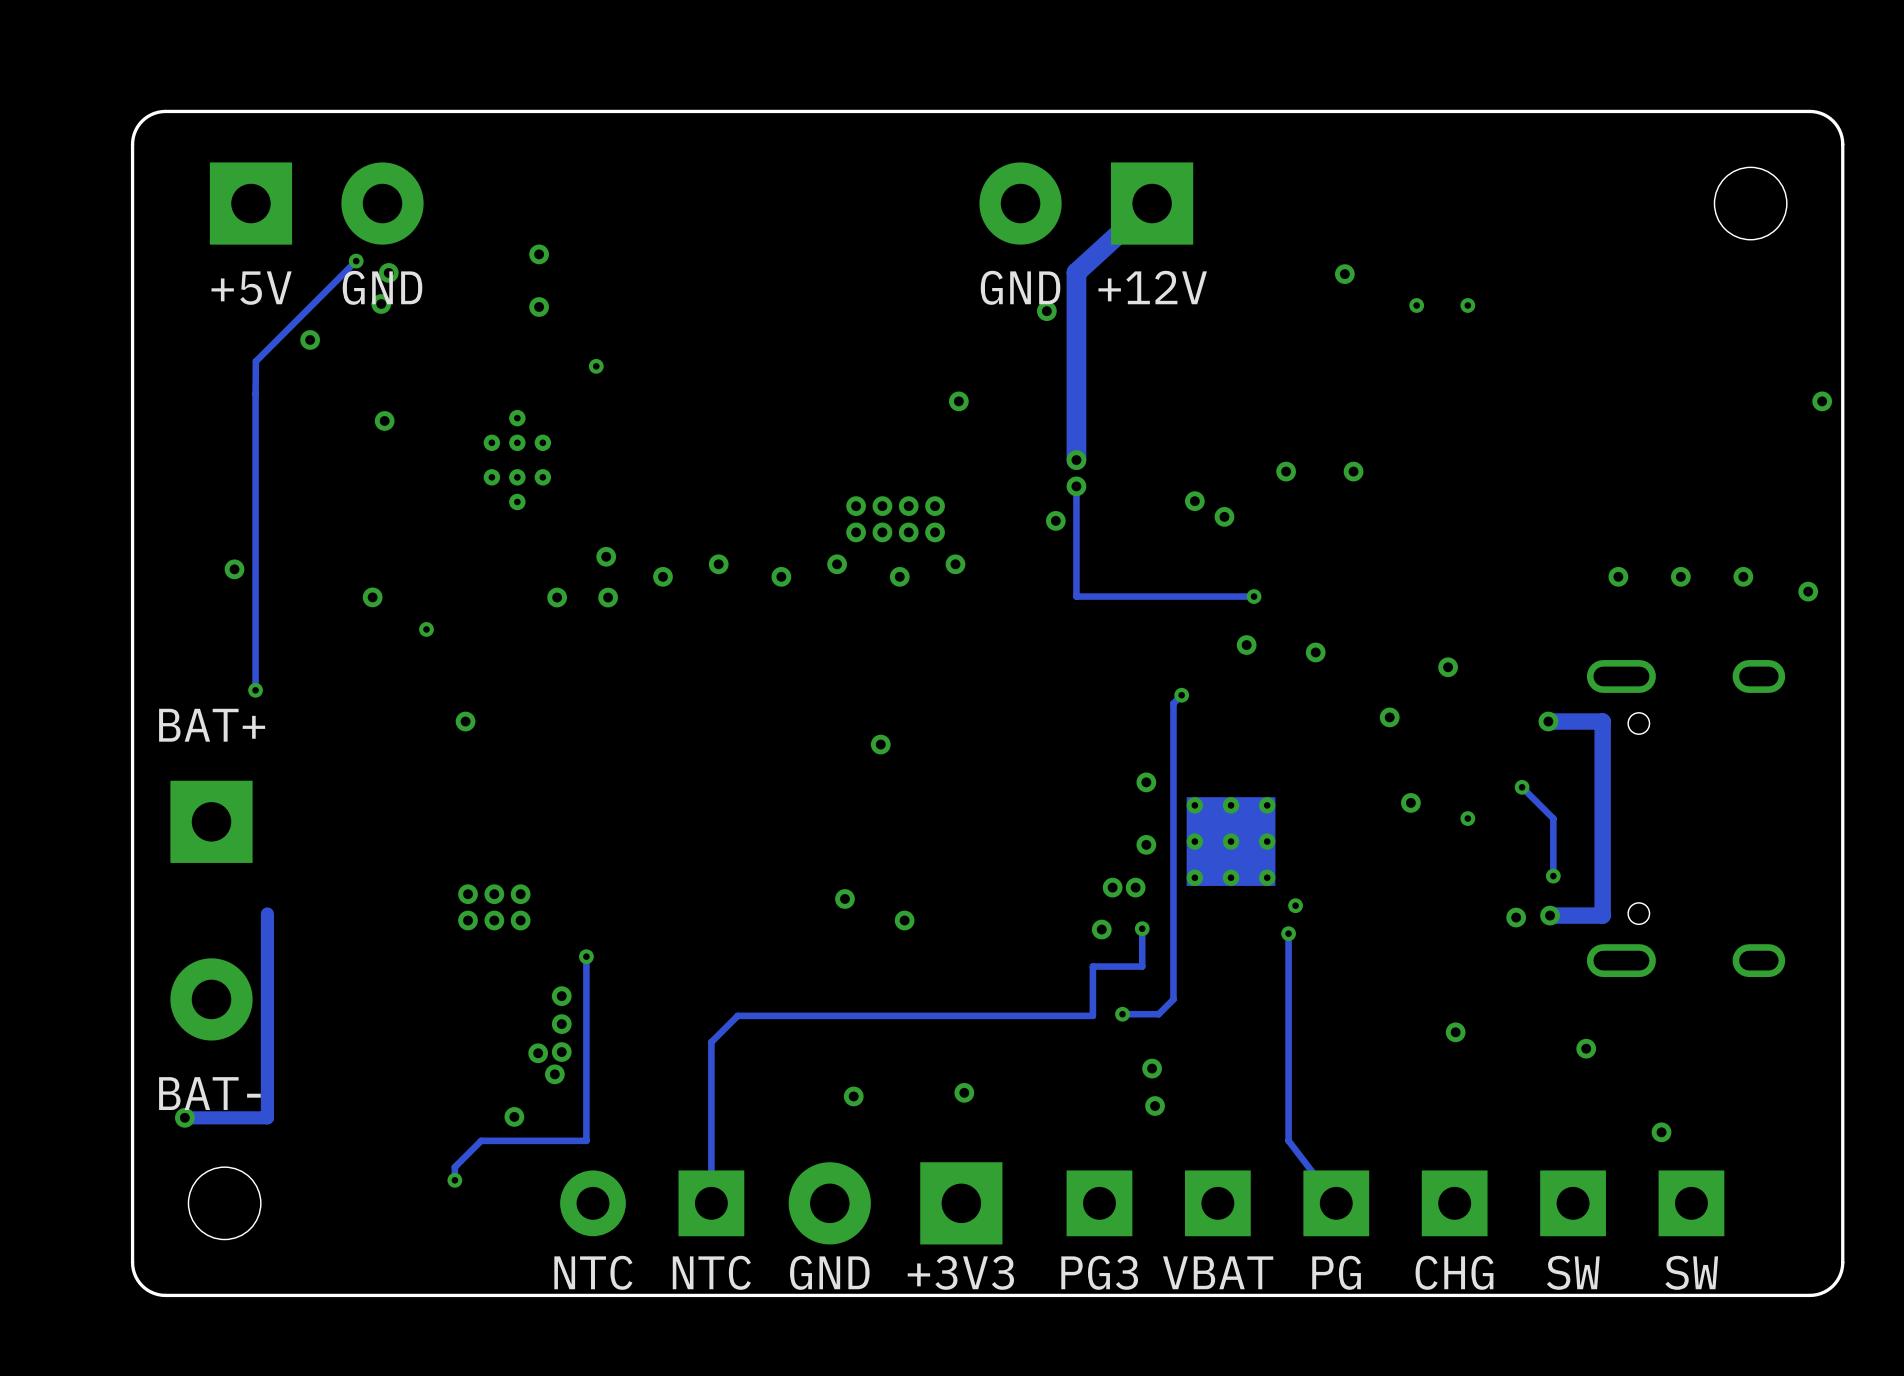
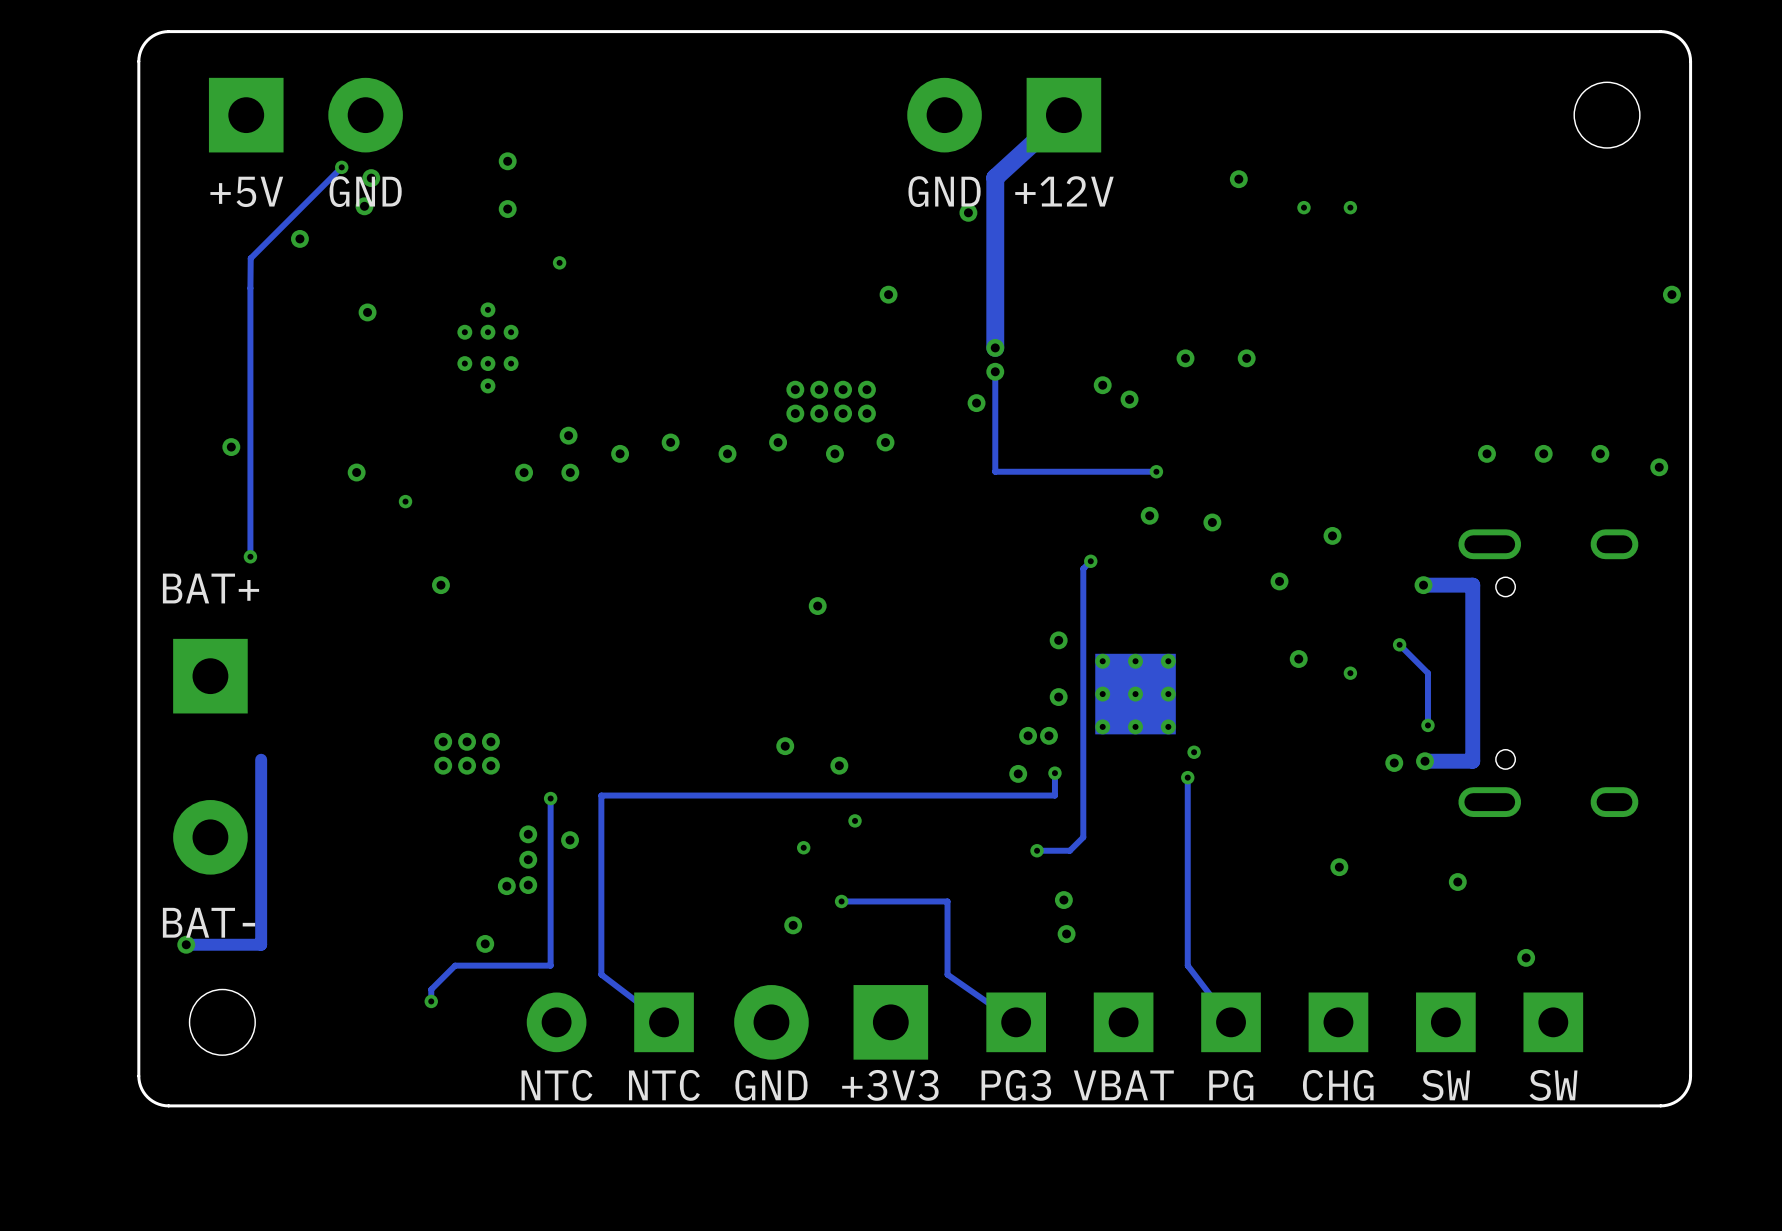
track: (1142, 953) (1142, 966) (1092, 966) (1092, 1015) (737, 1015) (711, 1042) (711, 1203) -> (1054, 795) (601, 795) (601, 974) (664, 1022)
via: none -> (855, 820)
via: none -> (803, 847)
track: none -> (841, 901) (947, 901) (947, 974) (1016, 1022)
via: none -> (841, 901)
via position: (554, 1074) -> (570, 840)
via: (964, 1092) -> none

